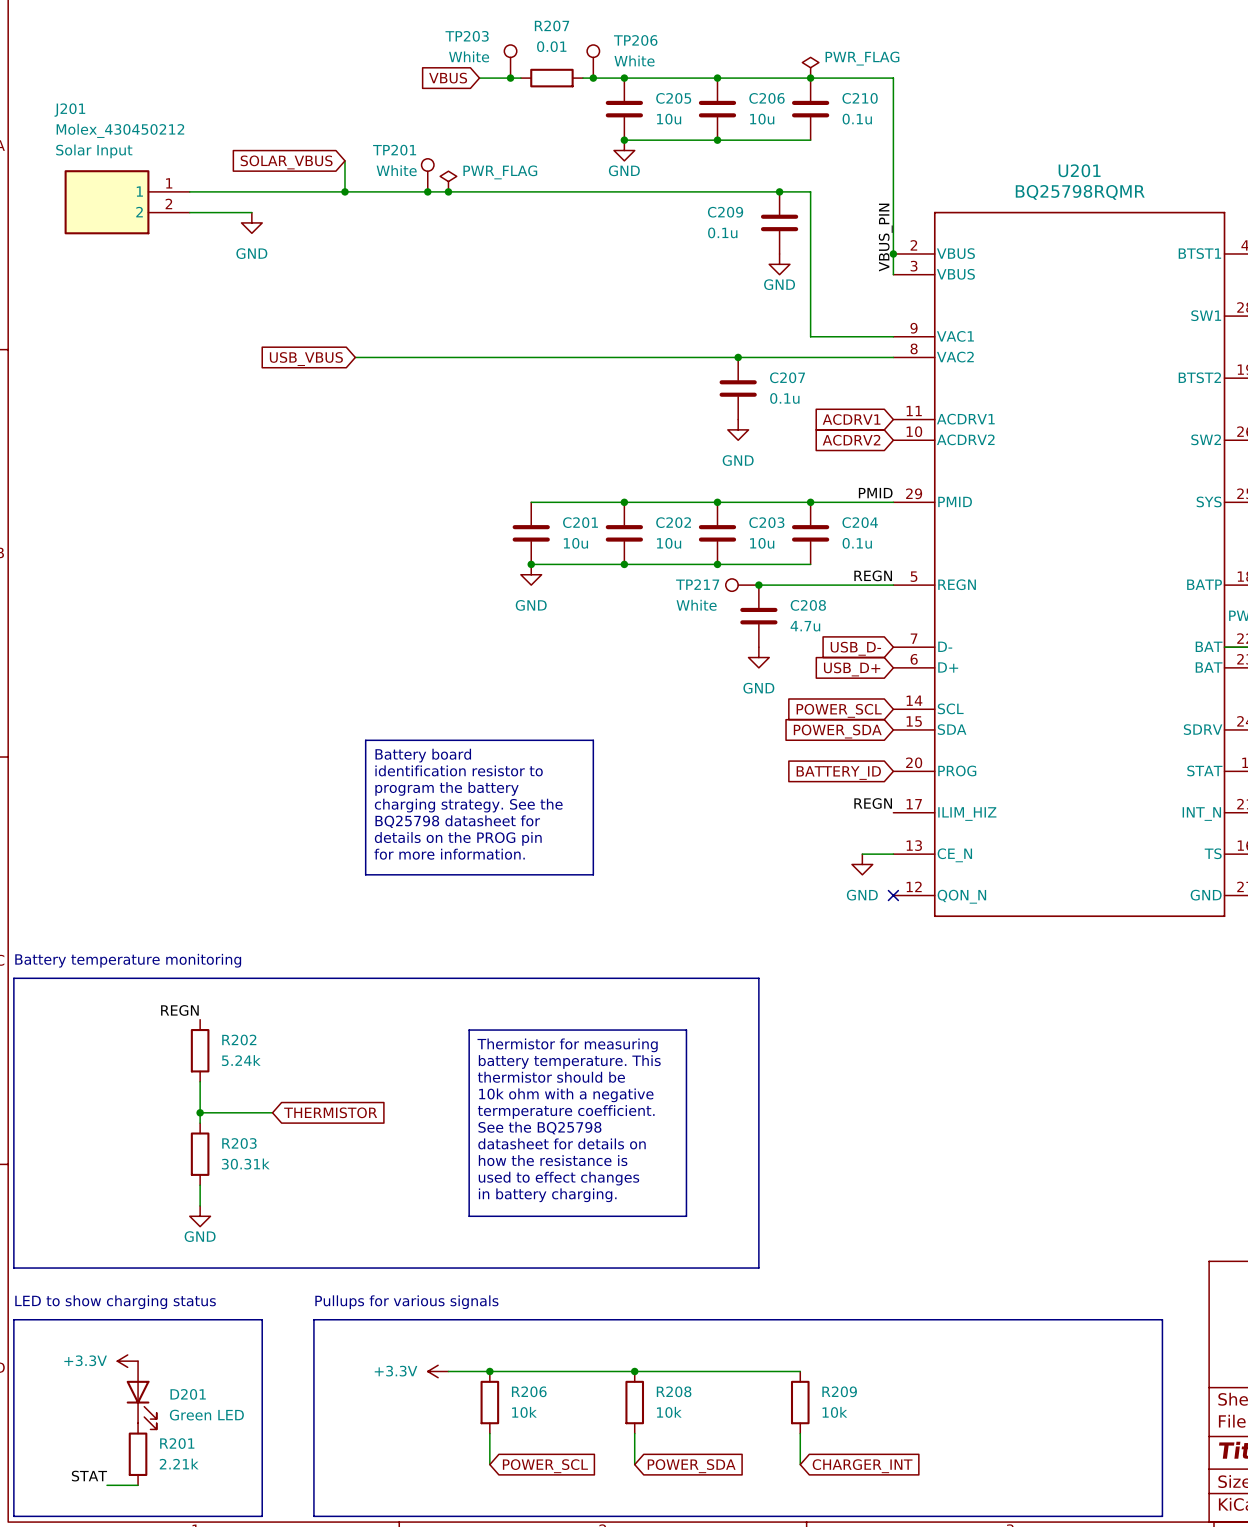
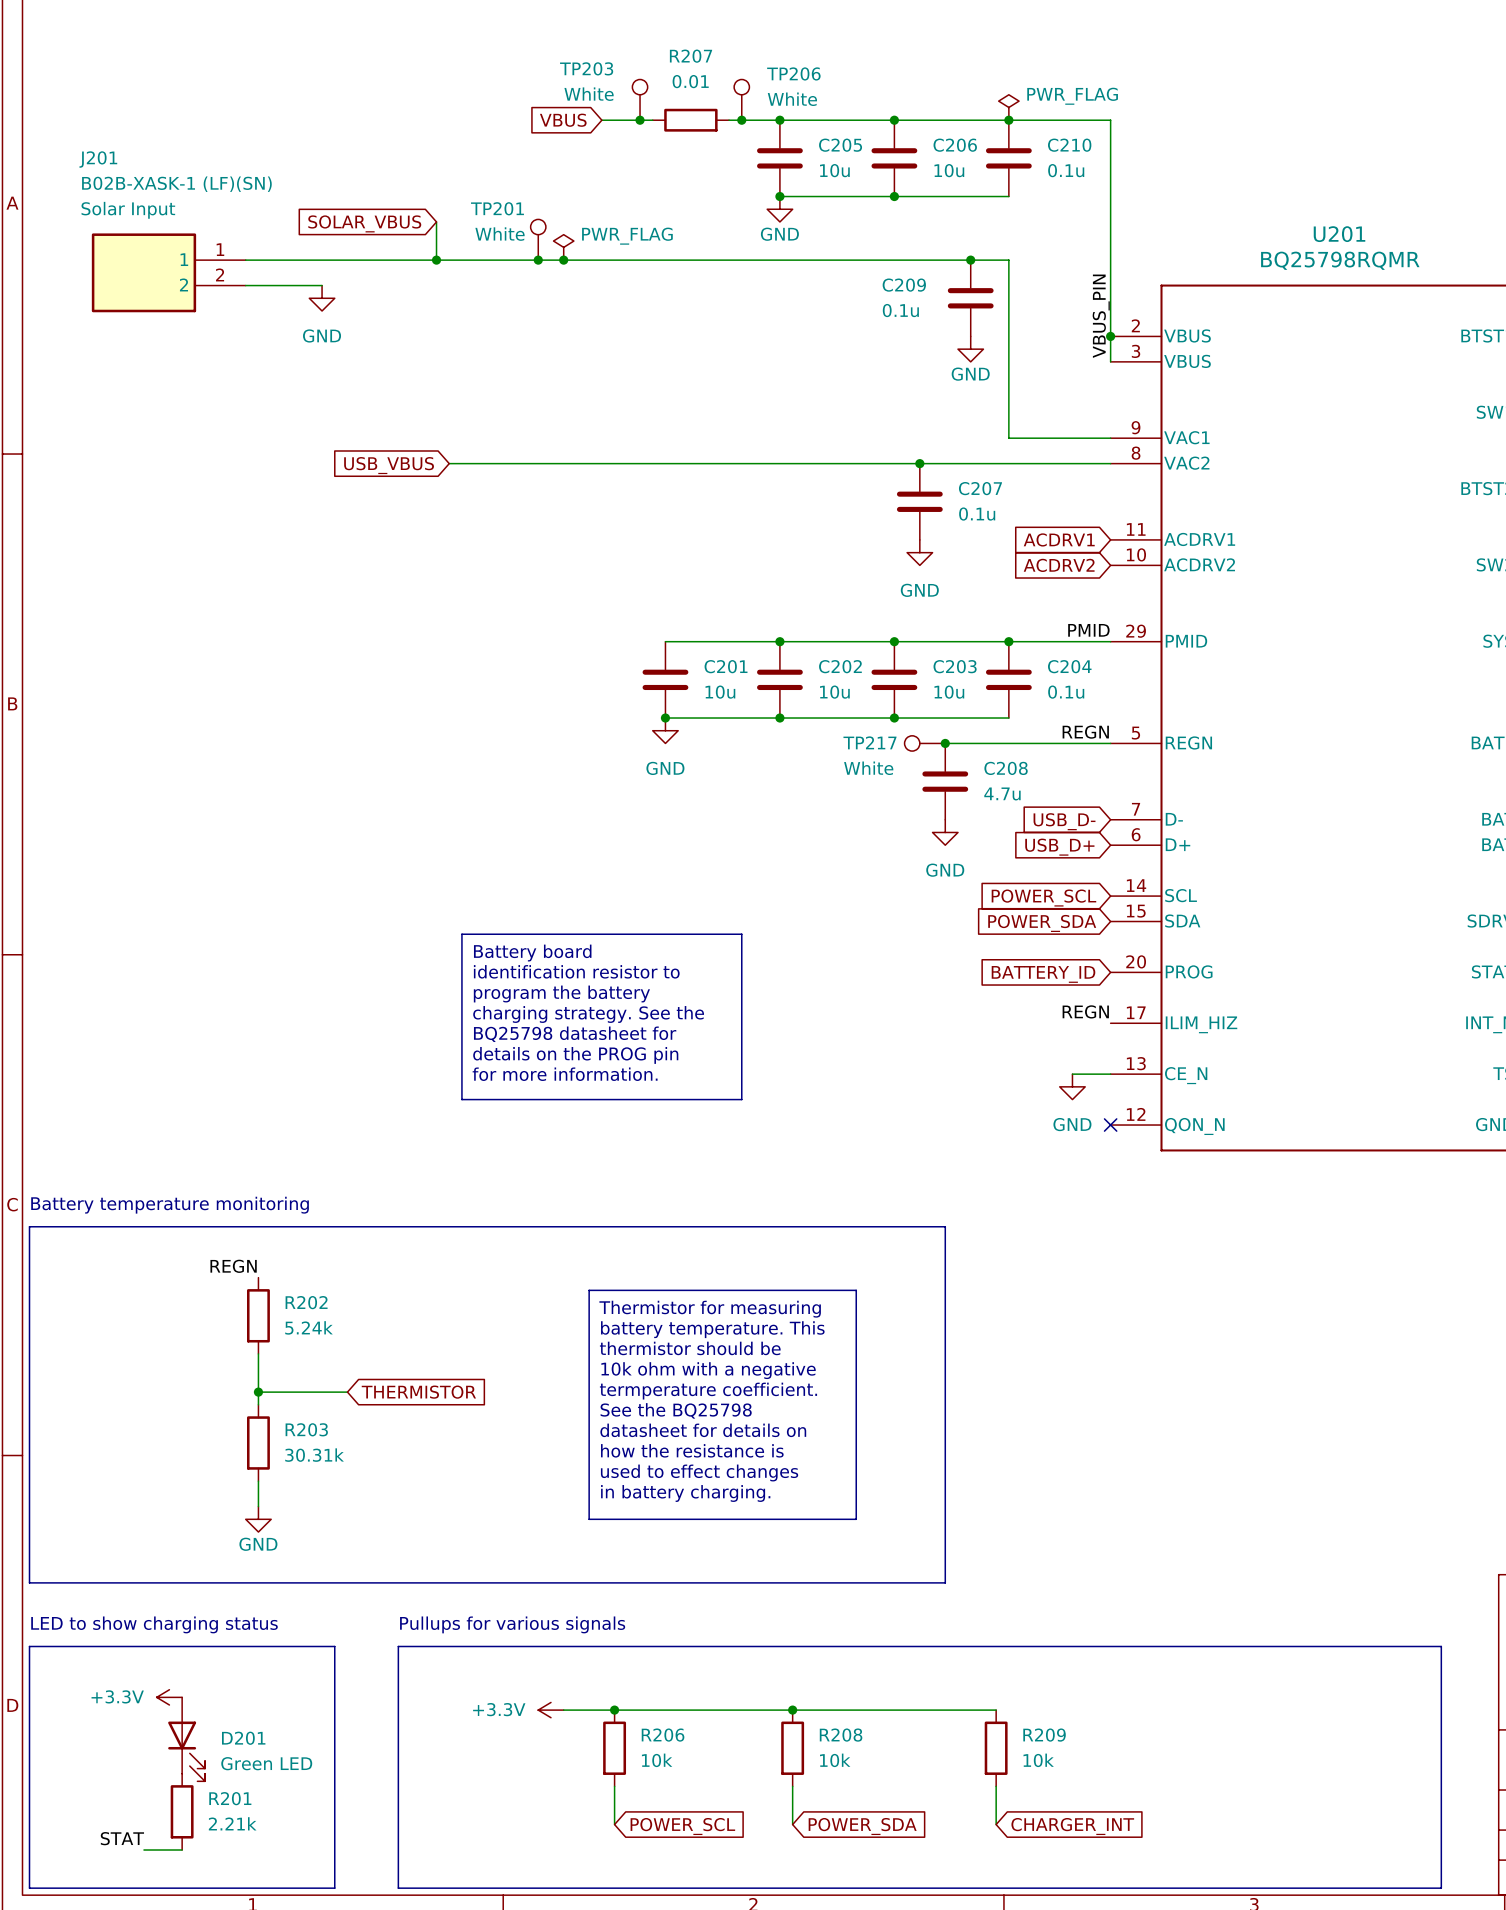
J201 value: Molex_430450212 (120, 130) -> B02B-XASK-1 (LF)(SN) (176, 184)

